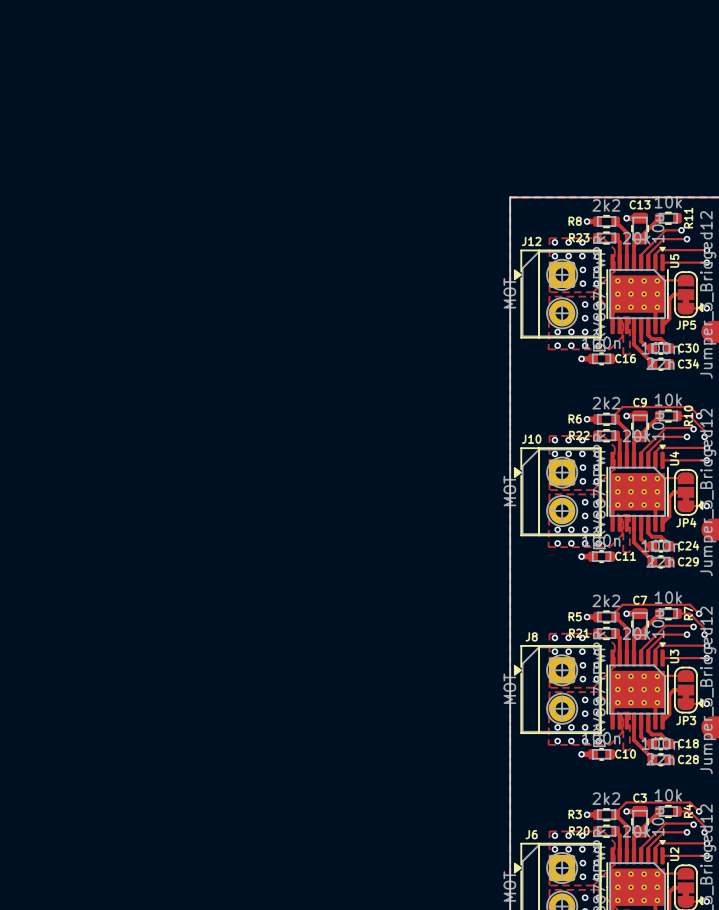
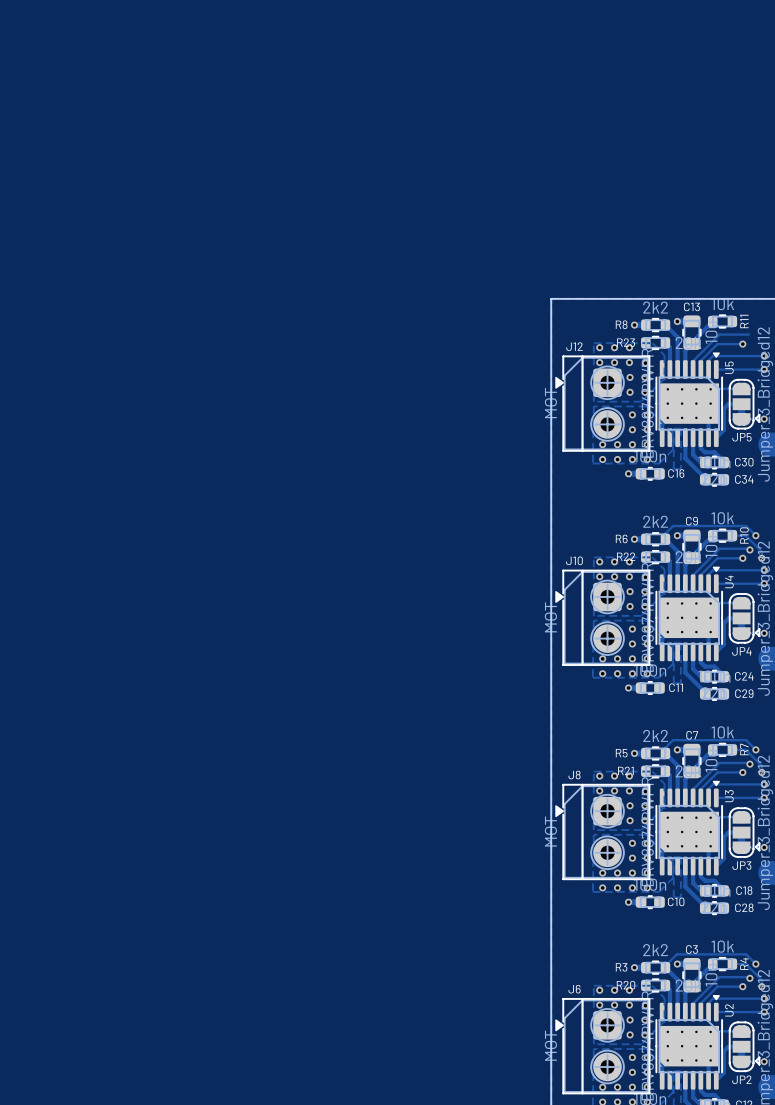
track: none -> (736, 334) (748, 334)
via: (681, 230) -> none

